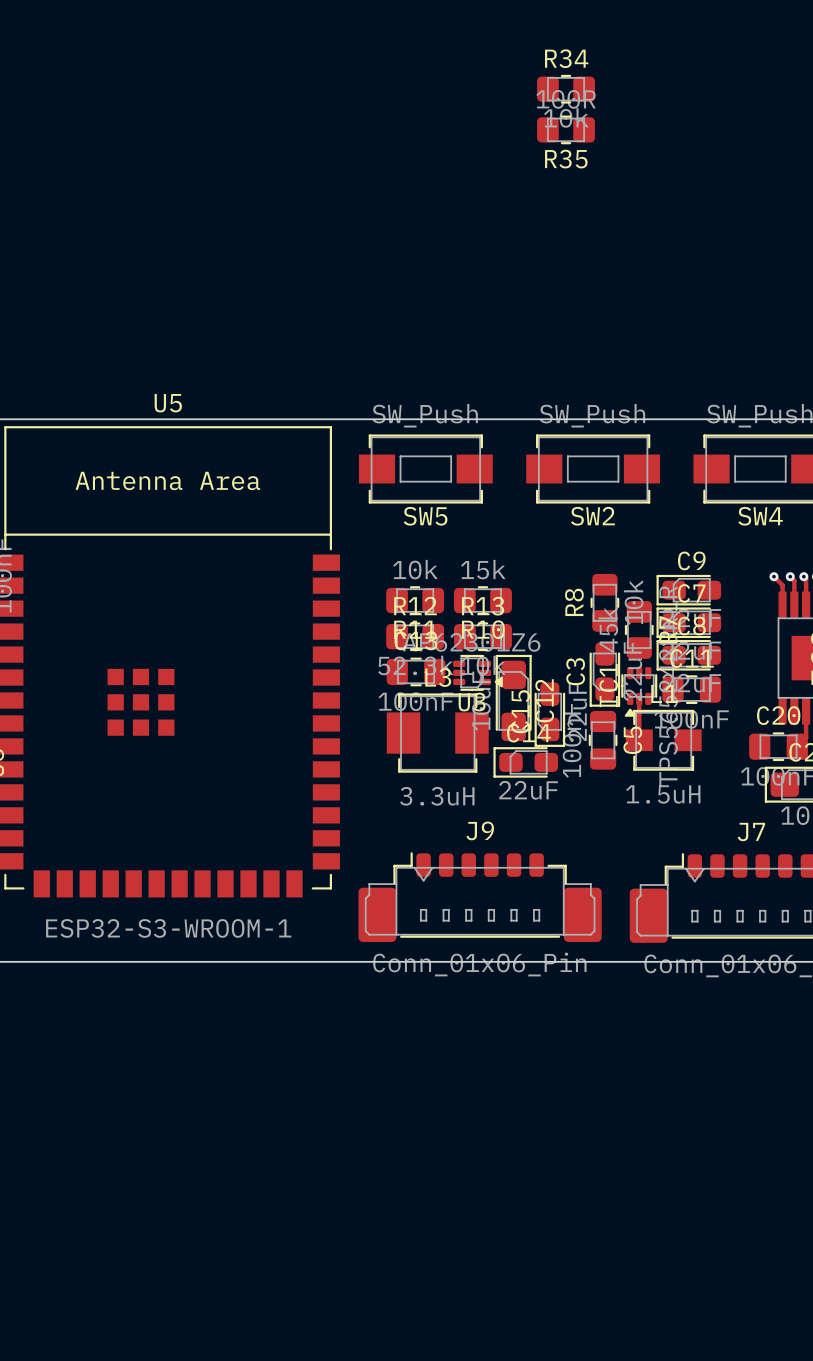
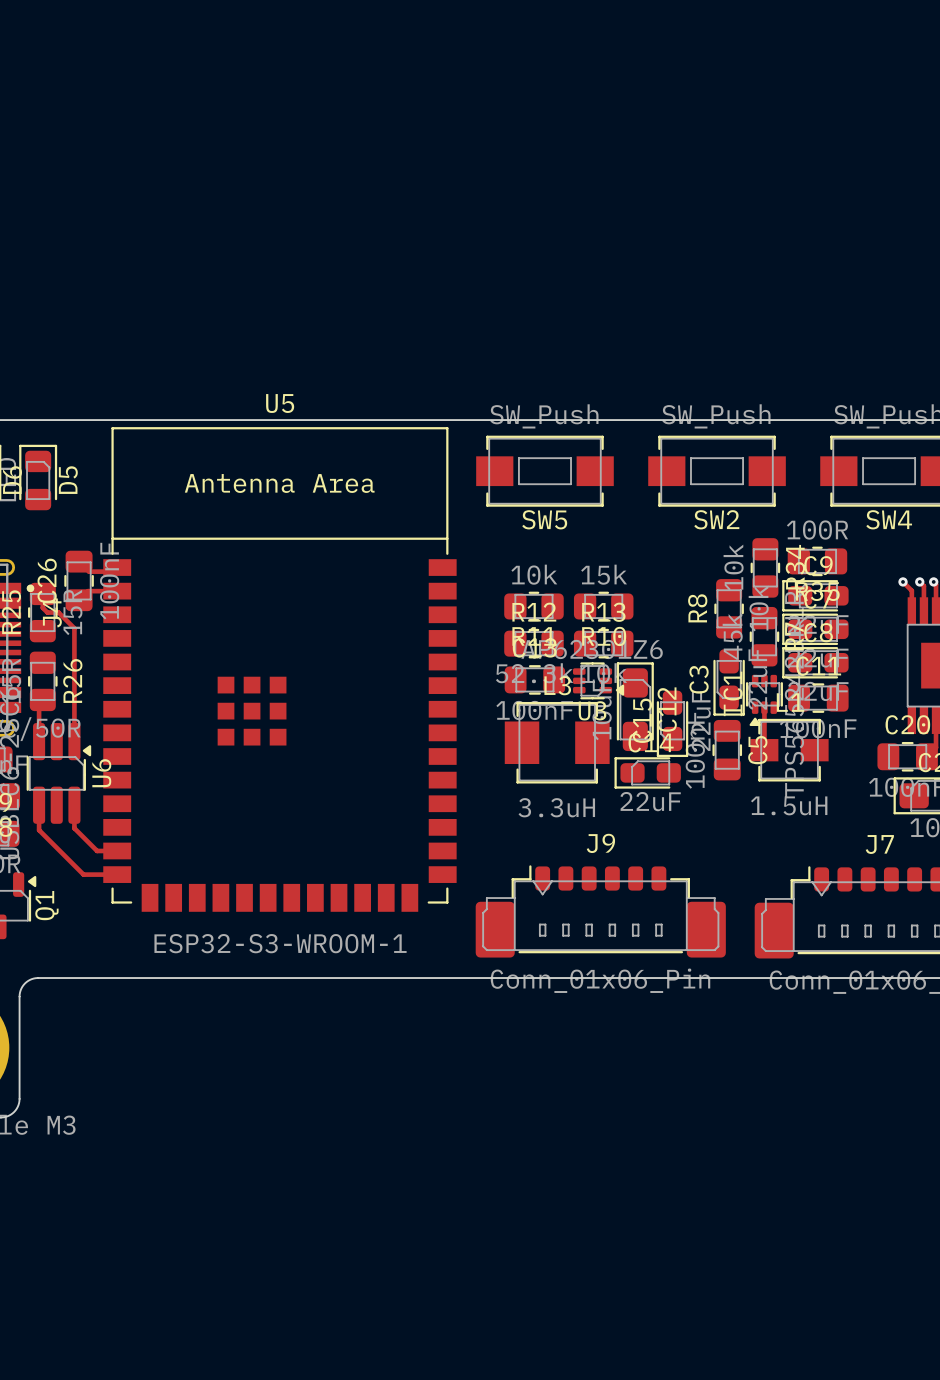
R34 rotation: 0° (566, 89) -> 90° clockwise (765, 567)
R34 position: (566, 89) -> (765, 567)
R35 position: (566, 129) -> (817, 561)

